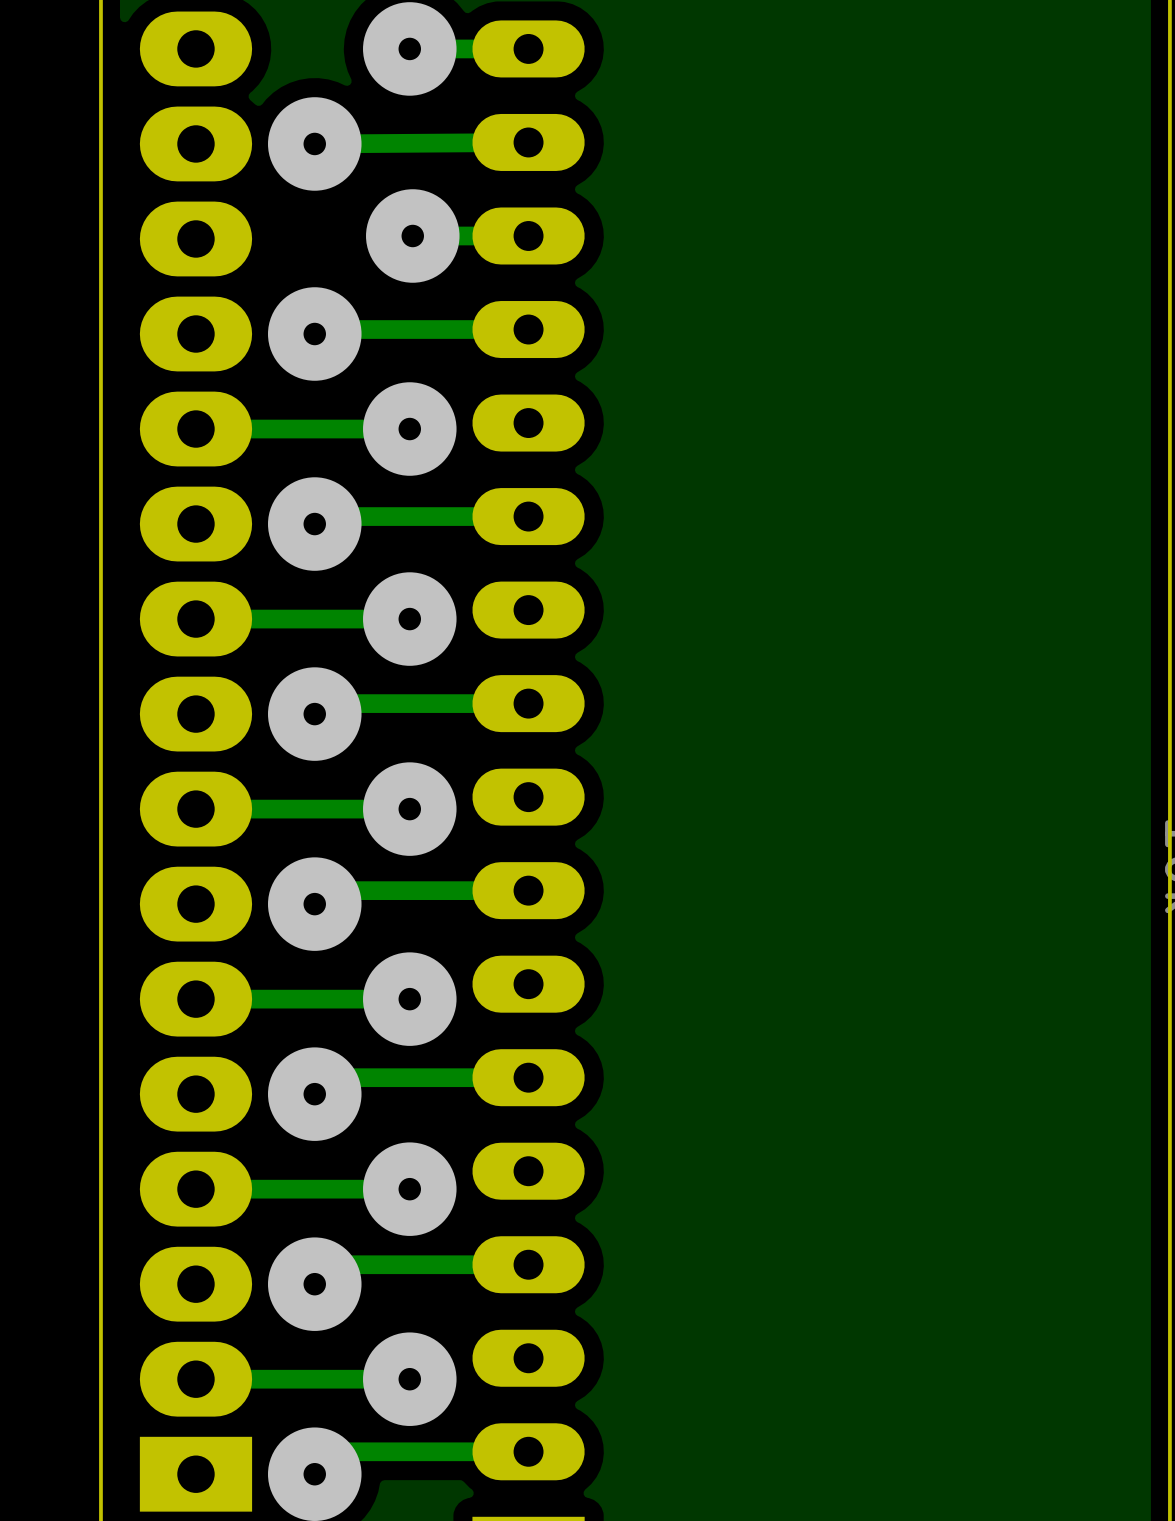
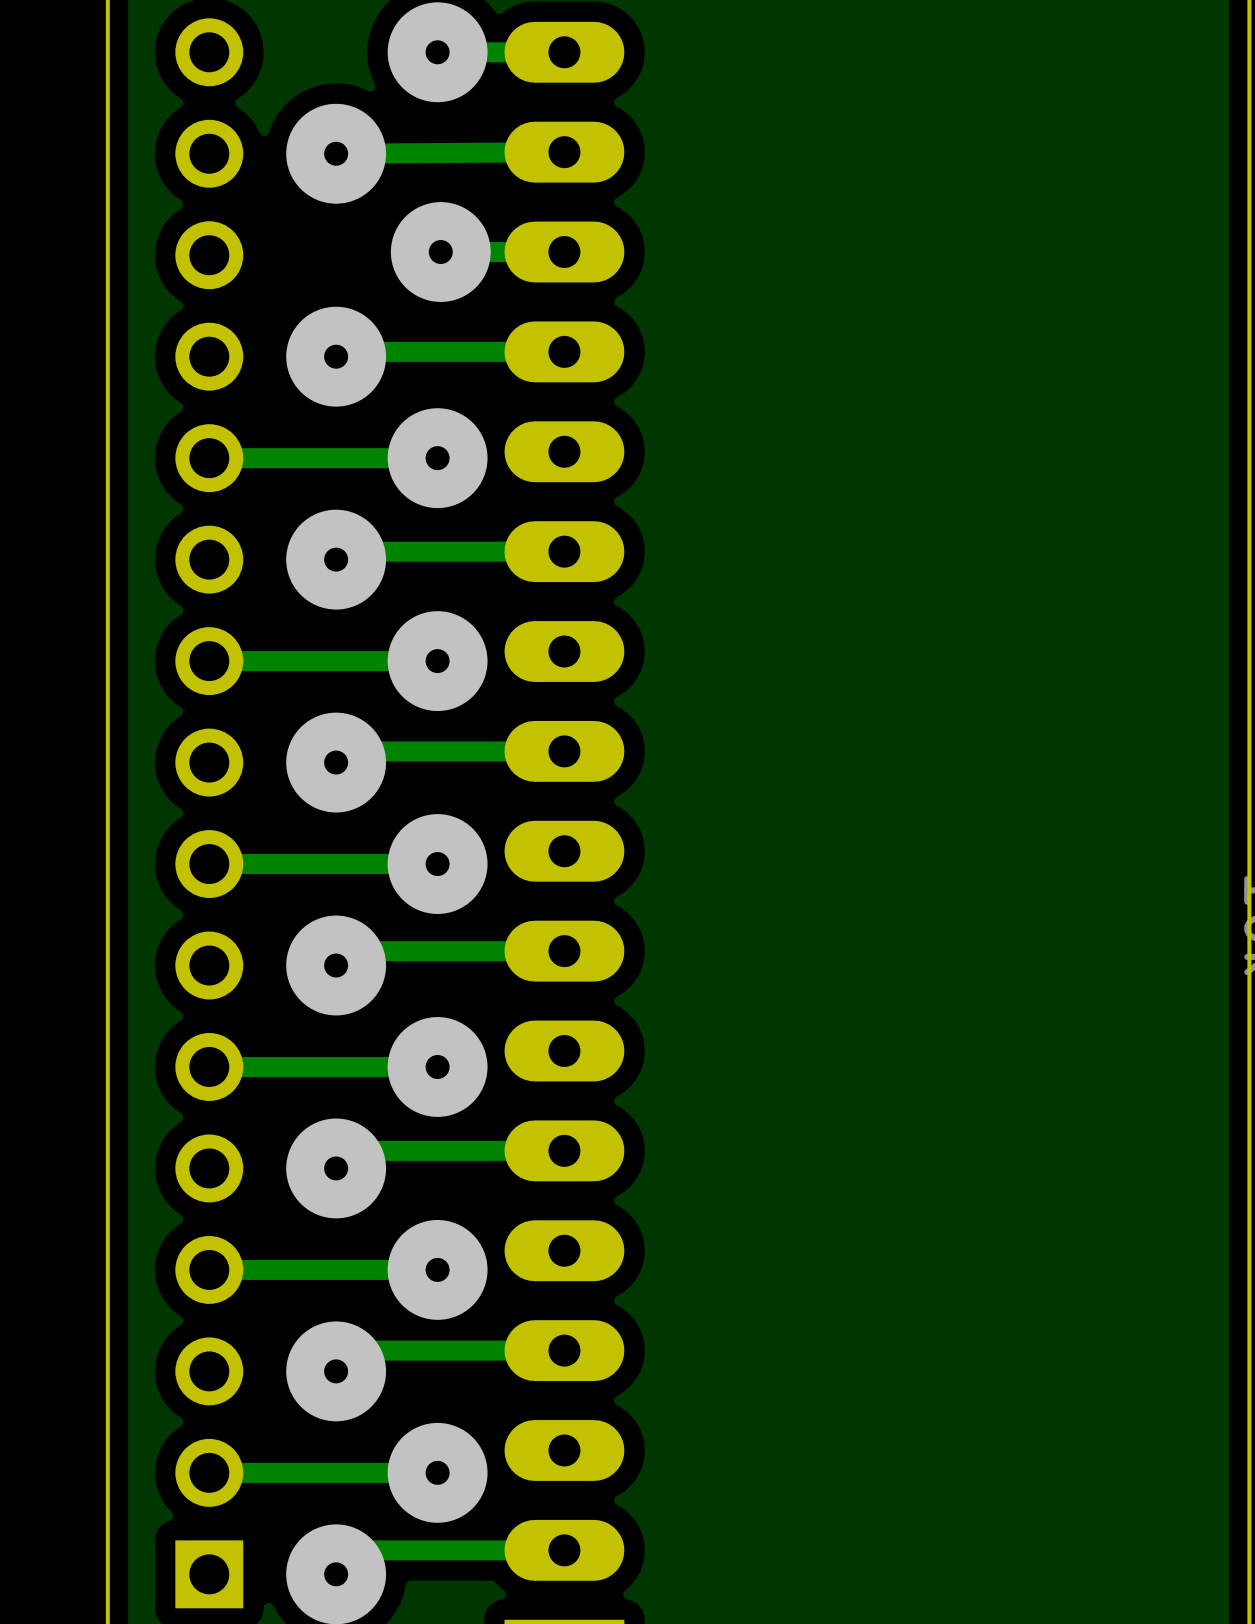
part footprint: [139, 11, 253, 1512] -> [175, 18, 244, 1609]

